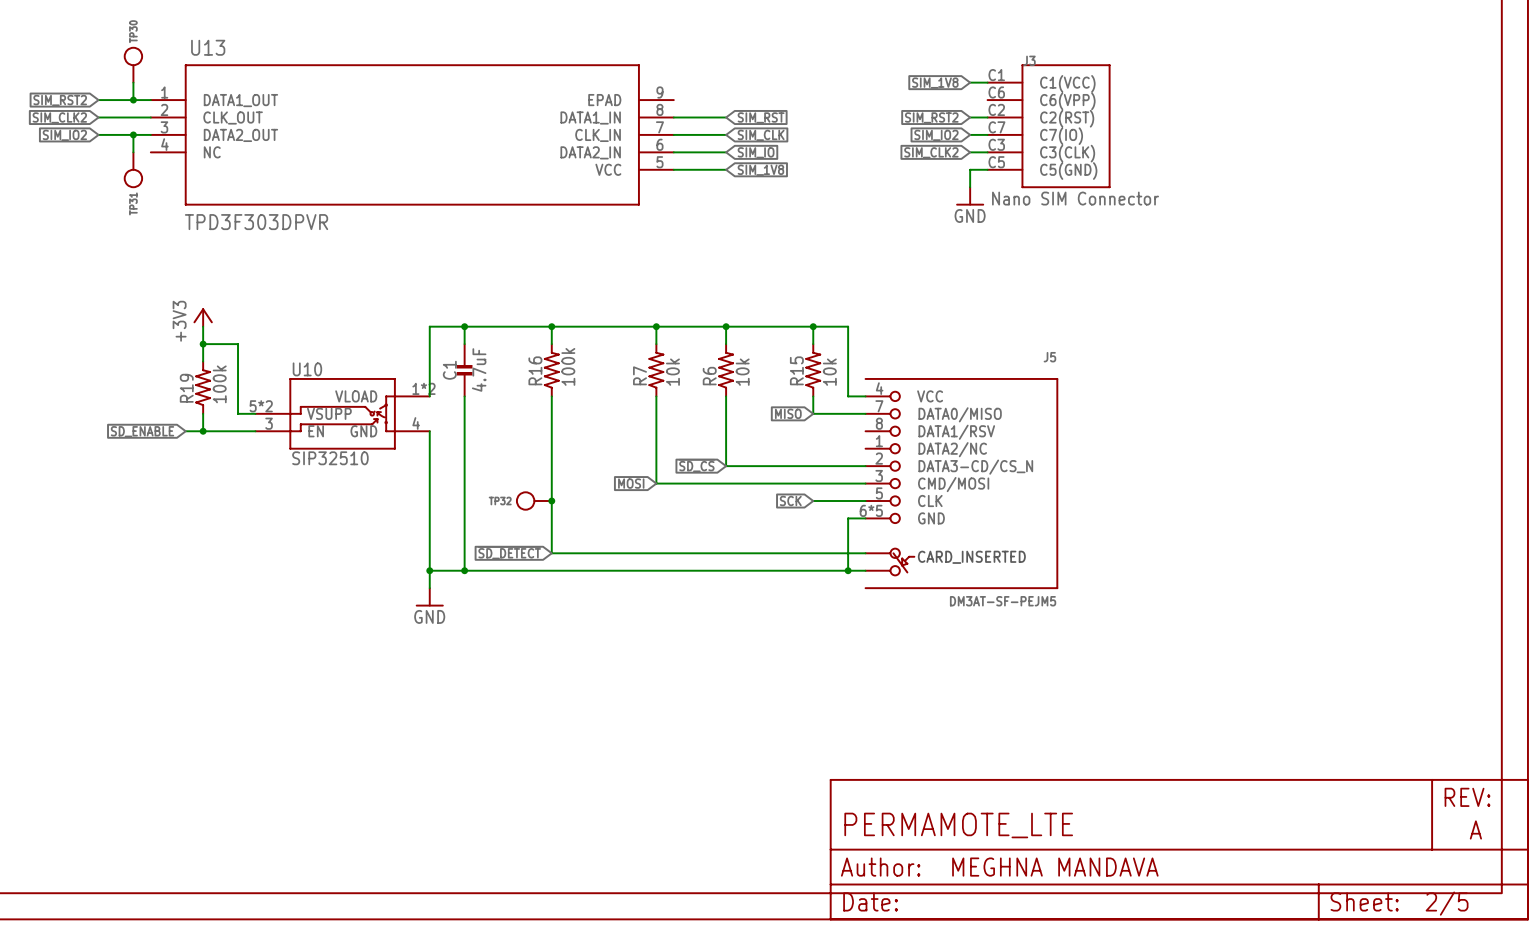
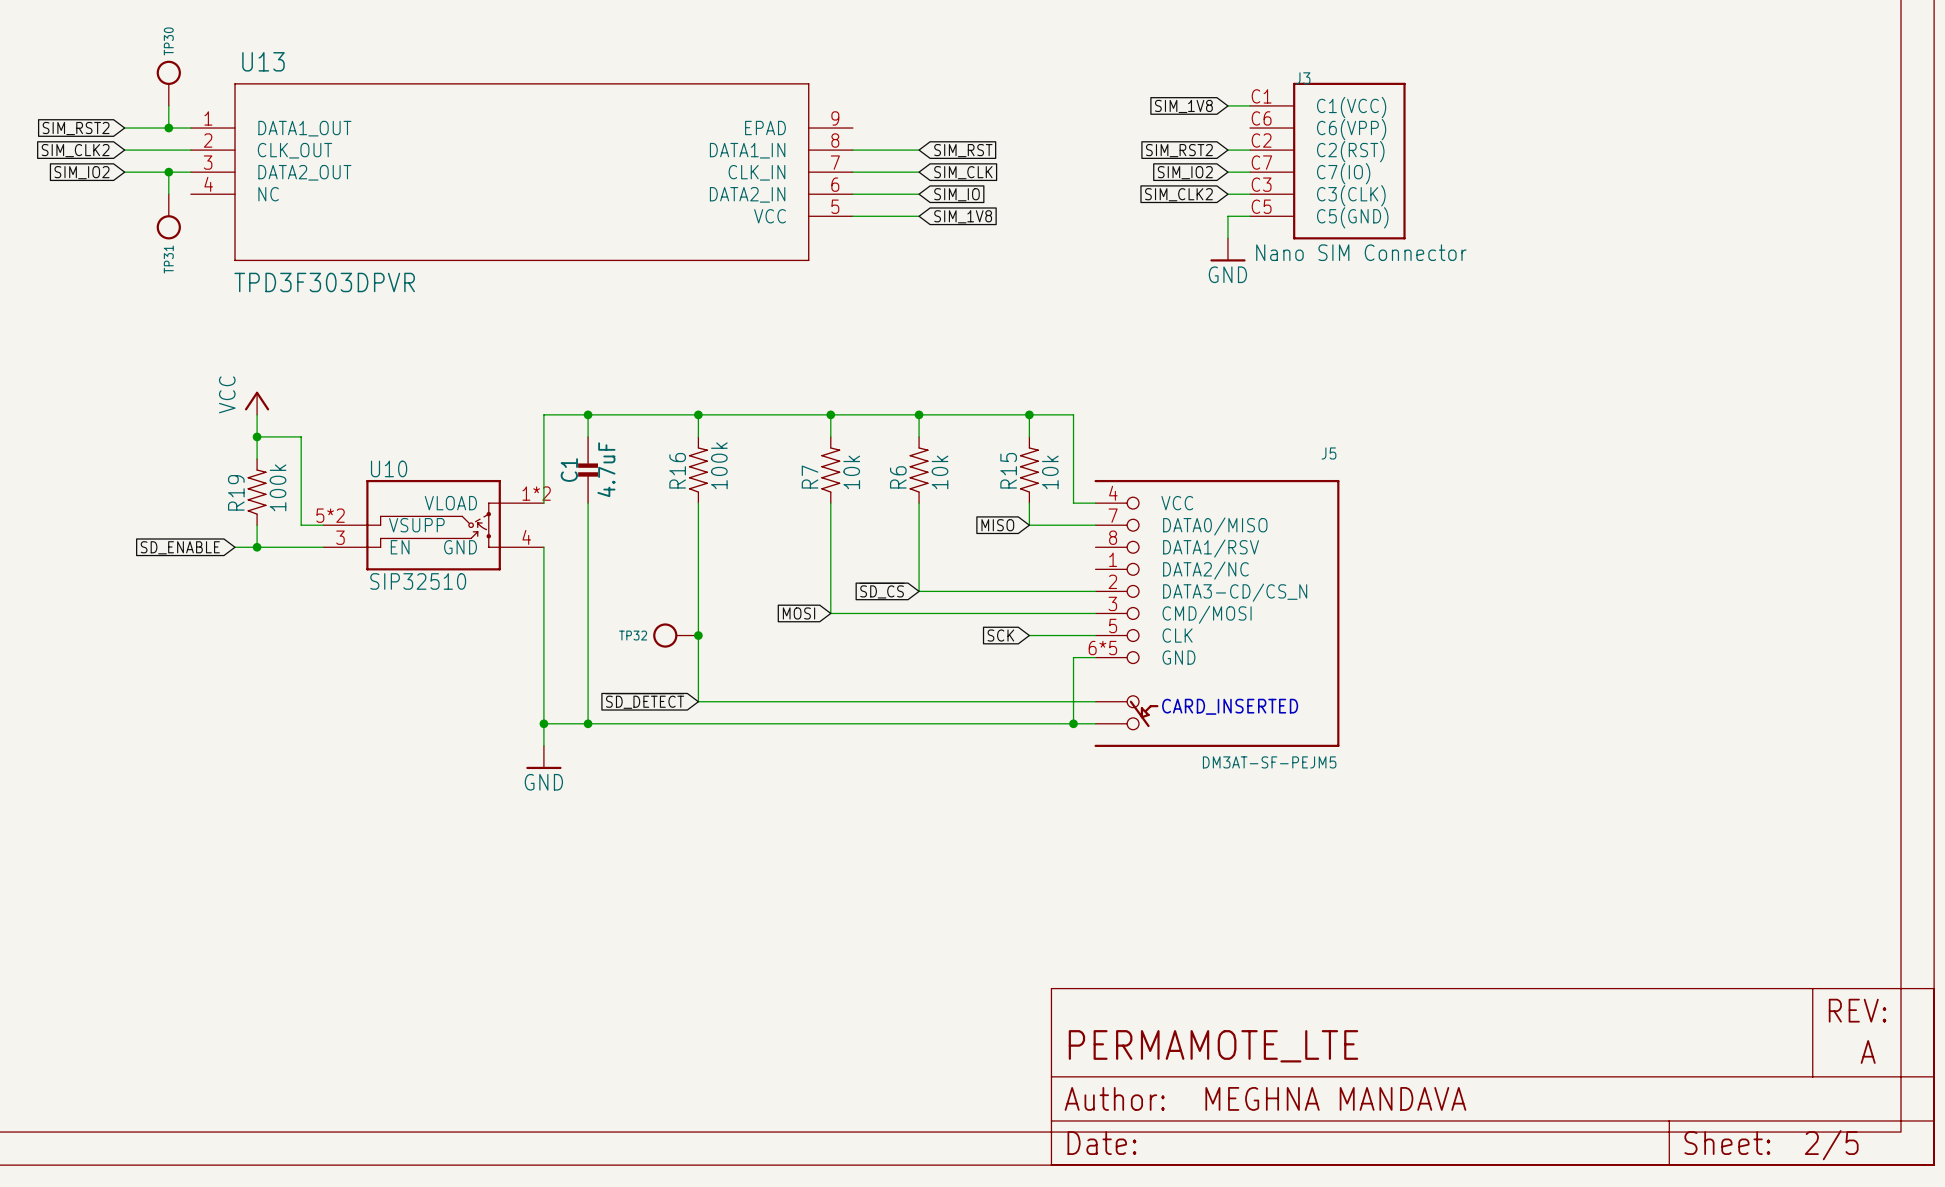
power symbol: +3V3 (203, 317) -> VCC (257, 403)

